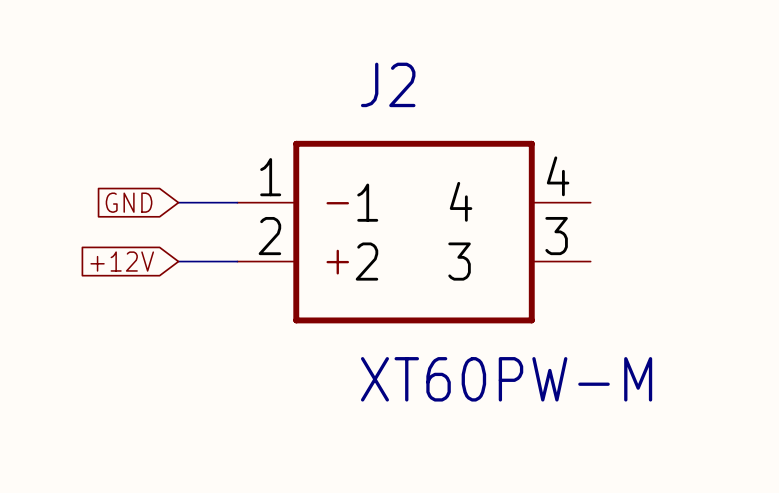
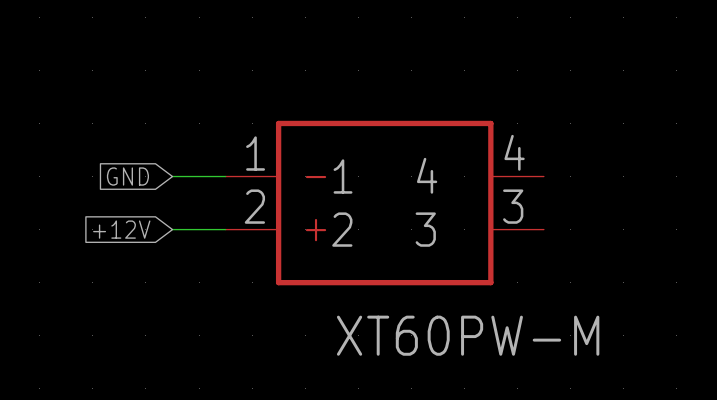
J2 name: J2 (388, 84) -> none

